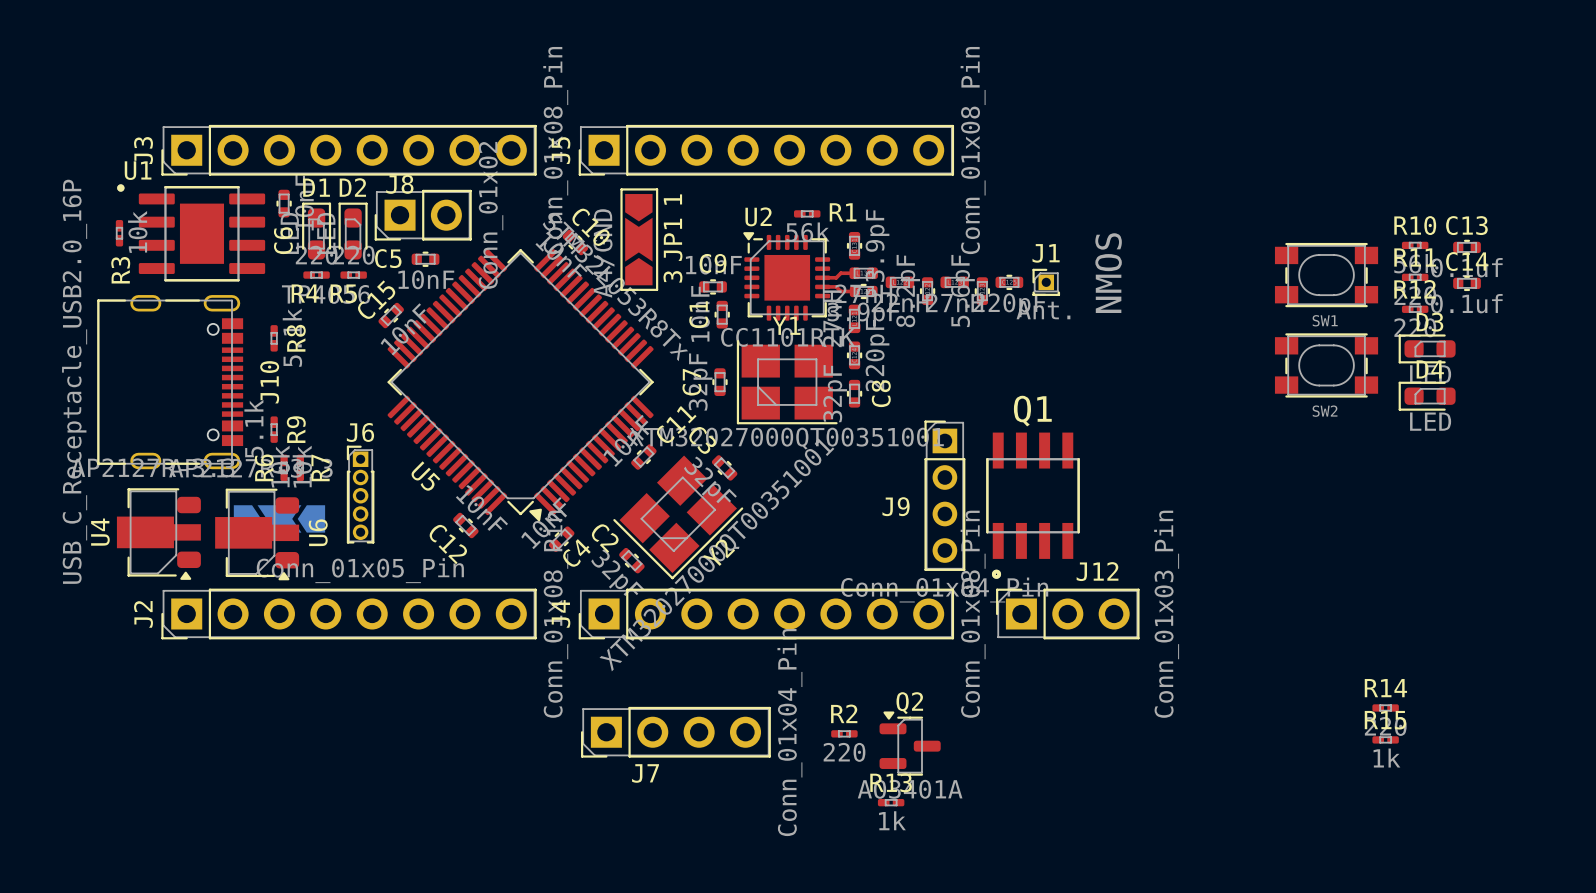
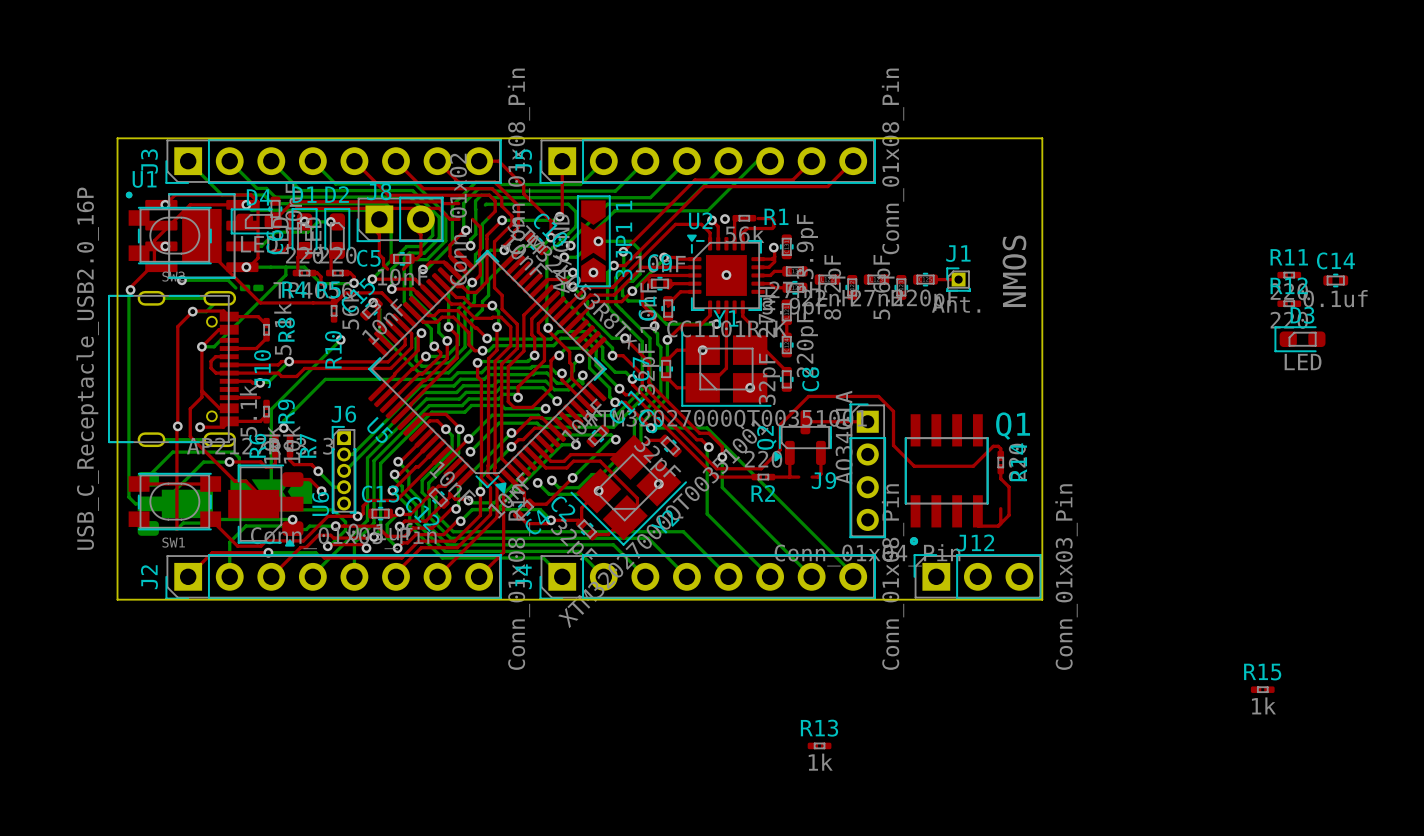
bottom track: none -> (188, 161) (221, 194) (263, 194) (272, 203) (385, 203) (391, 208) (391, 260) (372, 279)
bottom track: none -> (229, 161) (256, 188) (266, 188) (275, 197) (409, 197) (432, 219) (432, 235) (421, 246) (406, 246) (397, 255) (397, 263) (391, 268) (391, 289)
bottom track: none -> (271, 161) (300, 190) (412, 190) (439, 217) (439, 238) (424, 253) (409, 253) (404, 258) (404, 301) (431, 329) (431, 343) (434, 346)
bottom track: none -> (312, 161) (335, 183) (415, 183) (445, 214) (445, 240) (427, 259) (410, 260) (410, 294) (438, 322) (438, 332) (447, 340)
top track: none -> (354, 161) (388, 195) (489, 195) (495, 201) (495, 211) (488, 217)
top track: none -> (396, 161) (423, 188) (492, 188) (501, 198) (501, 206) (511, 216) (511, 224) (494, 241) (494, 287) (502, 295) (502, 309) (517, 324) (517, 348) (501, 364) (501, 458) (515, 472)
top track: none -> (437, 161) (458, 182) (494, 182) (518, 205) (518, 227) (514, 231) (514, 235) (504, 245) (504, 250)
top track: none -> (479, 161) (498, 161) (523, 186) (523, 193) (550, 221) (550, 237)
top track: none -> (562, 161) (562, 214) (559, 216)
bottom track: none -> (603, 161) (580, 184) (497, 184) (494, 182) (475, 182) (452, 205) (452, 243) (426, 269) (423, 269)
bottom track: none -> (645, 161) (615, 191) (494, 191) (492, 188) (478, 188) (463, 203) (463, 228) (465, 230)
bottom track: none -> (686, 161) (650, 197) (491, 197) (489, 195) (481, 195) (475, 201) (475, 234) (470, 239) (470, 245)
bottom track: none -> (728, 161) (685, 204) (607, 204) (570, 241) (570, 245)
bottom track: none -> (770, 161) (757, 161) (707, 210) (615, 210) (588, 237) (588, 245) (576, 257) (564, 257)
top track: none -> (811, 161) (792, 180) (695, 180) (623, 251)
top track: none -> (853, 161) (827, 186) (704, 186) (625, 265) (613, 265)
top track: none -> (458, 203) (443, 203) (441, 201) (293, 201) (273, 221)
top track: none -> (165, 204) (175, 194) (250, 194) (258, 202) (258, 258) (249, 267) (246, 267)
via: none -> (165, 204)
top track: none -> (246, 204) (190, 204) (154, 240) (154, 263) (130, 287) (130, 290)
bottom track: none -> (246, 204) (251, 210) (370, 210) (372, 212) (372, 227)
via: none -> (246, 204)
bottom track: none -> (485, 205) (568, 204) (575, 211) (575, 226) (546, 253) (548, 327)
bottom track: none -> (559, 216) (556, 220) (502, 220)
via: none -> (559, 216)
bottom track: none -> (488, 217) (482, 224) (482, 247) (475, 254) (475, 265) (448, 291) (448, 327)
via: none -> (725, 219)
top track: none -> (744, 218) (737, 218) (734, 221) (734, 243)
top track: none -> (758, 218) (772, 218) (773, 226) (772, 228) (747, 228) (742, 232) (742, 243)
top track: none -> (459, 219) (450, 219) (439, 208) (296, 208) (290, 215) (290, 244) (283, 250) (273, 250)
top track: none -> (472, 219) (480, 227) (480, 249) (480, 275) (472, 282)
top track: none -> (502, 220) (487, 235) (487, 281) (476, 292) (468, 292) (462, 286) (457, 286) (447, 277)
via: none -> (502, 220)
top track: none -> (712, 220) (718, 226) (718, 243)
via: none -> (712, 220)
via: none -> (304, 221)
bottom track: none -> (330, 221) (318, 221) (307, 232) (275, 232) (261, 246) (246, 246)
via: none -> (330, 221)
top track: none -> (372, 227) (379, 234) (379, 254) (383, 258) (383, 265) (387, 269)
top track: none -> (413, 227) (420, 234) (420, 254) (403, 269)
R10 name position: R10 (1415, 225) -> R10 (333, 349)
top track: none -> (465, 230) (450, 245) (450, 256) (459, 265)
via: none -> (465, 230)
R3 side: top (119, 233) -> bottom (251, 287)
bottom track: none -> (550, 237) (542, 246) (522, 246) (488, 279) (488, 295) (482, 301) (482, 309) (471, 320) (471, 349) (448, 372) (419, 372) (379, 333) (379, 309) (373, 302)
via: none -> (550, 237)
bottom track: none -> (598, 241) (631, 241) (639, 250) (639, 274) (622, 287) (622, 295) (628, 300) (643, 300) (666, 324) (716, 324)
via: none -> (598, 241)
top track: none -> (710, 243) (710, 232) (701, 224) (675, 224) (612, 287) (586, 287) (561, 312)
via: none -> (470, 245)
via: none -> (570, 245)
via: none -> (165, 246)
R10 rotation: 0° (1415, 245) -> 90° clockwise (334, 310)
R10 position: (1415, 245) -> (334, 310)
top track: none -> (773, 247) (774, 261) (769, 267) (758, 267)
via: none -> (773, 247)
C13 position: (1467, 247) -> (380, 513)
top track: none -> (304, 250) (297, 257) (297, 273)
top track: none -> (330, 250) (331, 273)
bottom track: none -> (504, 250) (490, 250) (482, 258) (482, 287) (474, 294) (474, 302) (465, 311) (465, 347) (449, 362) (433, 362) (430, 366) (421, 366) (416, 360) (416, 338) (421, 333)
via: none -> (504, 250)
bottom track: none -> (623, 251) (623, 269) (615, 277) (615, 304) (649, 338) (649, 390) (613, 427) (540, 427) (536, 423) (499, 423) (470, 451)
via: none -> (623, 251)
top track: none -> (210, 253) (260, 302) (334, 304) (345, 292) (381, 292) (407, 317)
top track: none -> (774, 256) (772, 259) (758, 259)
via: none -> (564, 257)
top track: none -> (664, 257) (694, 259)
bottom track: none -> (664, 257) (632, 291)
via: none -> (664, 257)
bottom track: none -> (613, 265) (607, 272) (607, 306) (642, 341) (642, 389) (615, 415) (563, 415) (560, 418) (541, 418) (538, 415) (492, 415) (468, 438)
via: none -> (613, 265)
bottom track: none -> (246, 267) (304, 267) (321, 283) (354, 283)
via: none -> (246, 267)
bottom track: none -> (285, 267) (285, 275) (214, 346) (201, 346)
top track: none -> (694, 267) (641, 267) (614, 295) (590, 295) (567, 317)
top track: none -> (423, 269) (430, 262) (444, 262) (453, 271)
via: none -> (423, 269)
bottom track: none -> (572, 272) (562, 282) (562, 298) (612, 348) (612, 355)
via: none -> (572, 272)
via: none -> (593, 272)
top track: none -> (311, 273) (317, 273) (321, 276) (321, 284)
top track: none -> (344, 273) (350, 273) (354, 276) (354, 283)
SW1 position: (1326, 275) -> (174, 501)
top track: none -> (694, 275) (650, 275) (642, 283) (642, 304) (654, 316) (654, 326)
via: none -> (726, 275)
top track: none -> (372, 279) (415, 279) (430, 294)
via: none -> (372, 279)
top track: none -> (933, 279) (958, 279)
bottom track: none -> (181, 280) (228, 280) (235, 288)
via: none -> (181, 280)
bottom track: none -> (472, 282) (467, 286) (467, 299) (458, 308) (458, 344) (446, 356) (425, 356)
via: none -> (472, 282)
via: none -> (354, 283)
top track: none -> (442, 283) (456, 297) (463, 297) (471, 305) (492, 305)
top track: none -> (694, 283) (673, 283) (668, 288)
top track: none -> (572, 286) (565, 279) (548, 279) (538, 288)
bottom track: none -> (572, 286) (587, 301) (587, 313) (611, 338) (625, 338)
via: none -> (572, 286)
top track: none -> (391, 289) (413, 289) (424, 300)
via: none -> (391, 289)
top track: none -> (436, 288) (451, 304) (460, 304) (474, 318) (501, 317) (510, 326) (510, 345) (495, 361) (494, 473) (503, 482) (503, 552) (479, 576)
bottom track: none -> (130, 290) (128, 291) (128, 497) (135, 503) (149, 503)
via: none -> (130, 290)
top track: none -> (632, 291) (621, 301) (595, 301) (573, 323)
via: none -> (632, 291)
top track: none -> (694, 291) (680, 291) (668, 306)
top track: none -> (544, 294) (523, 315) (523, 351) (508, 366) (508, 401) (513, 407) (532, 407) (551, 388) (551, 360) (556, 355) (559, 355)
bottom track: none -> (151, 298) (219, 298) (206, 311) (192, 311)
top track: none -> (550, 300) (531, 318) (534, 355)
top track: none -> (373, 302) (378, 308) (378, 324) (389, 335)
via: none -> (373, 302)
bottom track: none -> (492, 305) (498, 312) (496, 327)
via: none -> (492, 305)
top track: none -> (418, 306) (428, 315) (434, 315) (439, 310) (458, 310) (487, 338)
top track: none -> (555, 306) (538, 323) (538, 332) (544, 338) (544, 360) (518, 387) (518, 397)
top track: none -> (710, 307) (710, 315) (700, 324) (682, 324) (667, 339)
top track: none -> (726, 307) (726, 368) (706, 387) (677, 387) (666, 376)
top track: none -> (742, 307) (742, 316) (750, 323) (750, 350) (765, 350) (786, 371)
via: none -> (192, 311)
top track: none -> (413, 312) (423, 322) (437, 322) (442, 317) (453, 317) (468, 332) (468, 344) (475, 350) (482, 350)
top track: none -> (786, 320) (786, 337)
top track: none -> (401, 323) (411, 333) (411, 347) (390, 368) (304, 368) (296, 376) (281, 376) (278, 373) (215, 373) (211, 368) (211, 361) (215, 356) (229, 356)
top track: none -> (266, 324) (258, 316) (229, 316) (223, 311) (193, 311) (177, 326) (176, 529)
via: none -> (716, 324)
bottom track: none -> (654, 326) (654, 330) (657, 333) (657, 343) (660, 347) (660, 394) (634, 421) (634, 441) (601, 474) (591, 474) (578, 487) (559, 487) (551, 480)
via: none -> (654, 326)
top track: none -> (448, 327) (457, 335) (457, 357) (401, 414)
via: none -> (448, 327)
top track: none -> (496, 327) (496, 350) (488, 358) (488, 476) (497, 485) (497, 517) (437, 576)
via: none -> (496, 327)
top track: none -> (548, 327) (548, 330) (569, 352) (571, 378) (590, 397)
via: none -> (548, 327)
top track: none -> (395, 329) (405, 338) (405, 344) (388, 361) (281, 361) (278, 364) (229, 364)
top track: none -> (225, 332) (229, 329) (218, 329) (201, 346) (201, 397) (190, 408) (190, 436) (234, 481) (245, 481) (268, 504) (291, 504)
top track: none -> (421, 333) (418, 336) (418, 350) (379, 391)
via: none -> (421, 333)
top track: none -> (266, 338) (256, 348) (229, 348)
top track: none -> (625, 338) (648, 362) (648, 382) (699, 433) (708, 433) (722, 446) (722, 457)
via: none -> (625, 338)
bottom track: none -> (487, 338) (550, 339) (558, 331) (586, 331) (602, 347) (602, 359) (615, 372) (625, 372) (632, 378)
via: none -> (487, 338)
bottom track: none -> (340, 339) (271, 409) (271, 491)
via: none -> (340, 339)
bottom track: none -> (667, 339) (667, 398) (640, 423) (640, 444) (604, 481) (594, 481) (581, 494) (549, 494) (537, 482)
via: none -> (667, 339)
top track: none -> (447, 340) (447, 358) (395, 408)
via: none -> (447, 340)
top track: none -> (434, 346) (440, 352) (440, 355) (389, 402)
via: none -> (434, 346)
via: none -> (201, 346)
bottom track: none -> (482, 350) (488, 350) (493, 345) (553, 345) (561, 338) (584, 338) (596, 350) (596, 365) (619, 388)
via: none -> (482, 350)
top track: none -> (702, 350) (677, 350) (666, 361)
via: none -> (702, 350)
SW2 position: (1326, 365) -> (174, 235)
bottom track: none -> (534, 355) (527, 361) (477, 362)
via: none -> (534, 355)
bottom track: none -> (559, 355) (565, 348) (584, 348) (589, 353) (589, 368) (609, 388) (609, 396) (615, 402)
via: none -> (559, 355)
top track: none -> (612, 355) (623, 355) (642, 374) (642, 385) (696, 439) (701, 439) (708, 447)
via: none -> (612, 355)
top track: none -> (425, 356) (384, 397)
via: none -> (425, 356)
bottom track: none -> (579, 358) (573, 364) (571, 377) (566, 383) (557, 383) (546, 373) (535, 373) (533, 374) (488, 374) (484, 379) (460, 379) (453, 385) (421, 385) (352, 454) (344, 454)
via: none -> (579, 358)
bottom track: none -> (289, 361) (268, 382) (260, 382)
via: none -> (289, 361)
top track: none -> (477, 362) (477, 376) (481, 380) (481, 478) (490, 487) (490, 514) (457, 547) (421, 547) (396, 573) (396, 576)
via: none -> (477, 362)
top track: none -> (561, 373) (561, 379) (584, 402)
bottom track: none -> (561, 373) (556, 373) (549, 366) (532, 366) (530, 368) (486, 368) (481, 372) (457, 372) (451, 379) (325, 379) (283, 420) (283, 428) (281, 425)
via: none -> (561, 373)
bottom track: none -> (582, 375) (582, 383) (578, 380) (568, 389) (554, 389) (545, 381) (497, 381) (493, 385) (463, 385) (456, 392) (423, 392) (344, 470)
via: none -> (582, 375)
top track: none -> (632, 378) (632, 384) (716, 468) (761, 468) (780, 450) (780, 425) (808, 396) (878, 396) (893, 411) (893, 445) (914, 466) (973, 466) (993, 446) (998, 446) (1000, 448) (1000, 455)
via: none -> (632, 378)
top track: none -> (229, 381) (260, 382)
D4 position: (1427, 396) -> (256, 221)
via: none -> (260, 382)
via: none -> (750, 387)
top track: none -> (619, 388) (625, 394) (633, 394) (715, 477) (756, 477)
via: none -> (619, 388)
top track: none -> (201, 391) (219, 408) (229, 408)
Q1 name position: Q1 (1032, 411) -> Q1 (1013, 426)
top track: none -> (229, 397) (259, 397)
bottom track: none -> (518, 397) (514, 394) (503, 394) (498, 398) (468, 398) (462, 405) (429, 405) (374, 460) (374, 523) (354, 542) (354, 576)
via: none -> (518, 397)
bottom track: none -> (557, 401) (543, 387) (500, 387) (495, 392) (466, 392) (459, 399) (426, 399) (367, 458) (367, 520) (312, 576)
via: none -> (557, 401)
top track: none -> (615, 402) (625, 402) (650, 428)
via: none -> (615, 402)
bottom track: none -> (545, 408) (505, 408) (501, 405) (471, 405) (464, 412) (431, 412) (380, 463) (380, 529) (374, 537)
via: none -> (545, 408)
top track: none -> (266, 415) (260, 421) (229, 421) (223, 427) (199, 427)
top track: none -> (867, 421) (805, 422)
top track: none -> (413, 425) (424, 414) (445, 414) (459, 429)
via: none -> (177, 426)
via: none -> (200, 427)
via: none -> (283, 428)
bottom track: none -> (650, 428) (707, 428) (853, 574) (853, 576)
via: none -> (650, 428)
top track: none -> (445, 429) (437, 420) (429, 420) (418, 431)
bottom track: none -> (445, 429) (452, 435) (452, 450) (422, 480) (422, 492) (429, 499) (429, 517) (450, 538) (648, 538) (686, 576)
via: none -> (445, 429)
bottom track: none -> (459, 429) (458, 453) (428, 483) (428, 489) (435, 496) (435, 514) (453, 531) (683, 531) (728, 576)
via: none -> (459, 429)
top track: none -> (555, 431) (542, 417) (531, 417) (515, 433) (511, 433)
bottom track: none -> (511, 433) (458, 485) (458, 506) (456, 508)
via: none -> (511, 433)
top track: none -> (424, 437) (400, 461) (398, 461)
top track: none -> (550, 437) (540, 428) (534, 428) (523, 439) (518, 439) (511, 446)
top track: none -> (468, 438) (447, 460)
via: none -> (468, 438)
via: none -> (615, 439)
bottom track: none -> (151, 439) (219, 439)
top track: none -> (664, 440) (649, 440) (632, 457) (629, 454) (570, 454) (564, 461) (550, 461) (538, 449)
top track: none -> (430, 443) (399, 474) (394, 474)
bottom track: none -> (575, 444) (561, 444) (497, 509)
via: none -> (575, 444)
via: none -> (511, 446)
bottom track: none -> (511, 446) (480, 477) (480, 491)
bottom track: none -> (708, 447) (707, 448) (707, 513) (770, 576)
via: none -> (708, 447)
top track: none -> (436, 449) (392, 490)
via: none -> (470, 451)
top track: none -> (275, 452) (275, 463) (271, 467) (265, 467) (260, 461) (229, 461)
top track: none -> (290, 452) (290, 460) (294, 464) (311, 464) (318, 471)
top track: none -> (789, 452) (789, 477)
top track: none -> (820, 452) (820, 473) (817, 477) (812, 477)
U5 name position: U5 (425, 476) -> U5 (380, 429)
top track: none -> (442, 454) (396, 500) (368, 500) (363, 506) (363, 513) (360, 516) (328, 516) (303, 540) (266, 540) (261, 546) (237, 546) (210, 519)
top track: none -> (532, 454) (545, 467) (566, 467) (573, 461) (600, 461) (637, 498) (637, 505) (608, 534) (592, 534)
bottom track: none -> (722, 457) (722, 487) (811, 576)
via: none -> (722, 457)
via: none -> (229, 461)
bottom track: none -> (398, 461) (408, 472) (408, 488) (422, 502) (422, 519) (447, 544) (613, 544) (645, 576)
via: none -> (398, 461)
bottom track: none -> (229, 462) (203, 462) (161, 503)
top track: none -> (1000, 469) (1000, 478) (1009, 487) (1009, 515) (998, 526) (978, 526) (977, 511)
bottom track: none -> (318, 471) (334, 487) (344, 487)
via: none -> (318, 471)
top track: none -> (459, 472) (445, 486) (438, 486) (410, 514) (404, 514) (401, 511) (396, 515) (388, 513)
bottom track: none -> (394, 474) (394, 478) (402, 486) (402, 491) (416, 505) (416, 522) (445, 551) (578, 551) (603, 576)
via: none -> (394, 474)
top track: none -> (770, 477) (798, 477)
top track: none -> (572, 477) (546, 504) (529, 504) (524, 498) (524, 492) (509, 478)
bottom track: none -> (572, 477) (610, 439) (615, 439) (611, 434) (562, 434) (494, 502) (470, 502) (468, 500)
via: none -> (572, 477)
bottom track: none -> (145, 479) (172, 452) (233, 452) (239, 457) (238, 497) (250, 509) (333, 509) (345, 522) (345, 530) (329, 546) (327, 546) (329, 544) (327, 542)
top track: none -> (292, 479) (309, 479) (321, 491)
via: none -> (551, 480)
via: none -> (537, 482)
top track: none -> (139, 484) (210, 484)
via: none -> (658, 483)
bottom track: none -> (392, 490) (409, 507) (409, 525) (442, 557) (543, 557) (562, 576)
via: none -> (392, 490)
via: none -> (321, 491)
top track: none -> (598, 490) (581, 507) (581, 523) (578, 520) (551, 520) (547, 523) (527, 523) (518, 515)
via: none -> (598, 490)
top track: none -> (480, 491) (480, 515) (454, 541) (418, 541) (401, 557) (324, 557) (318, 555)
via: none -> (480, 491)
top track: none -> (468, 500) (455, 499) (449, 493) (449, 497) (425, 521) (405, 521) (399, 526)
via: none -> (468, 500)
U4 side: top (158, 534) -> bottom (175, 503)
U6 position: (257, 534) -> (265, 505)
top track: none -> (1000, 508) (1000, 523)
top track: none -> (456, 508) (451, 508) (432, 528) (413, 528) (404, 536) (387, 536) (377, 526) (335, 526)
via: none -> (456, 508)
bottom track: none -> (399, 511) (387, 524) (387, 537) (397, 548)
via: none -> (399, 511)
via: none -> (357, 516)
bottom track: none -> (292, 519) (218, 519) (215, 523) (183, 523) (176, 529) (148, 528)
via: none -> (292, 519)
bottom track: none -> (551, 520) (540, 509) (472, 509) (460, 521)
via: none -> (551, 520)
top track: none -> (460, 521) (457, 521) (443, 534) (415, 534) (407, 542) (402, 542) (397, 548)
via: none -> (460, 521)
bottom track: none -> (335, 526) (309, 526) (306, 529) (288, 529) (285, 526) (246, 526) (229, 542) (229, 576)
via: none -> (335, 526)
via: none -> (399, 526)
top track: none -> (374, 537) (333, 538) (330, 535) (318, 535) (306, 547) (300, 547) (271, 576)
via: none -> (374, 537)
J12 name position: J12 (1097, 571) -> J12 (975, 542)
top track: none -> (327, 546) (329, 544) (362, 544) (366, 548)
via: none -> (327, 546)
via: none -> (366, 548)
via: none -> (397, 548)
top track: none -> (268, 552) (212, 552) (188, 576)
bottom track: none -> (268, 552) (315, 552) (318, 555)
via: none -> (268, 552)
board edge: none -> (1042, 599) (117, 599) (117, 138) (1042, 138) (1042, 599)
R14 rotation: 0° (1385, 707) -> 90° clockwise (1000, 462)
R14 position: (1385, 707) -> (1000, 462)
R2 name position: R2 (844, 713) -> R2 (763, 493)
J7: Conn_01x04_Pin (675, 732) -> none
R2 position: (844, 733) -> (763, 477)
Q2 rotation: 0° (910, 743) -> 90° counterclockwise (803, 437)
Q2 position: (910, 743) -> (803, 437)
R2 value position: 220 (844, 752) -> 220 (763, 459)

